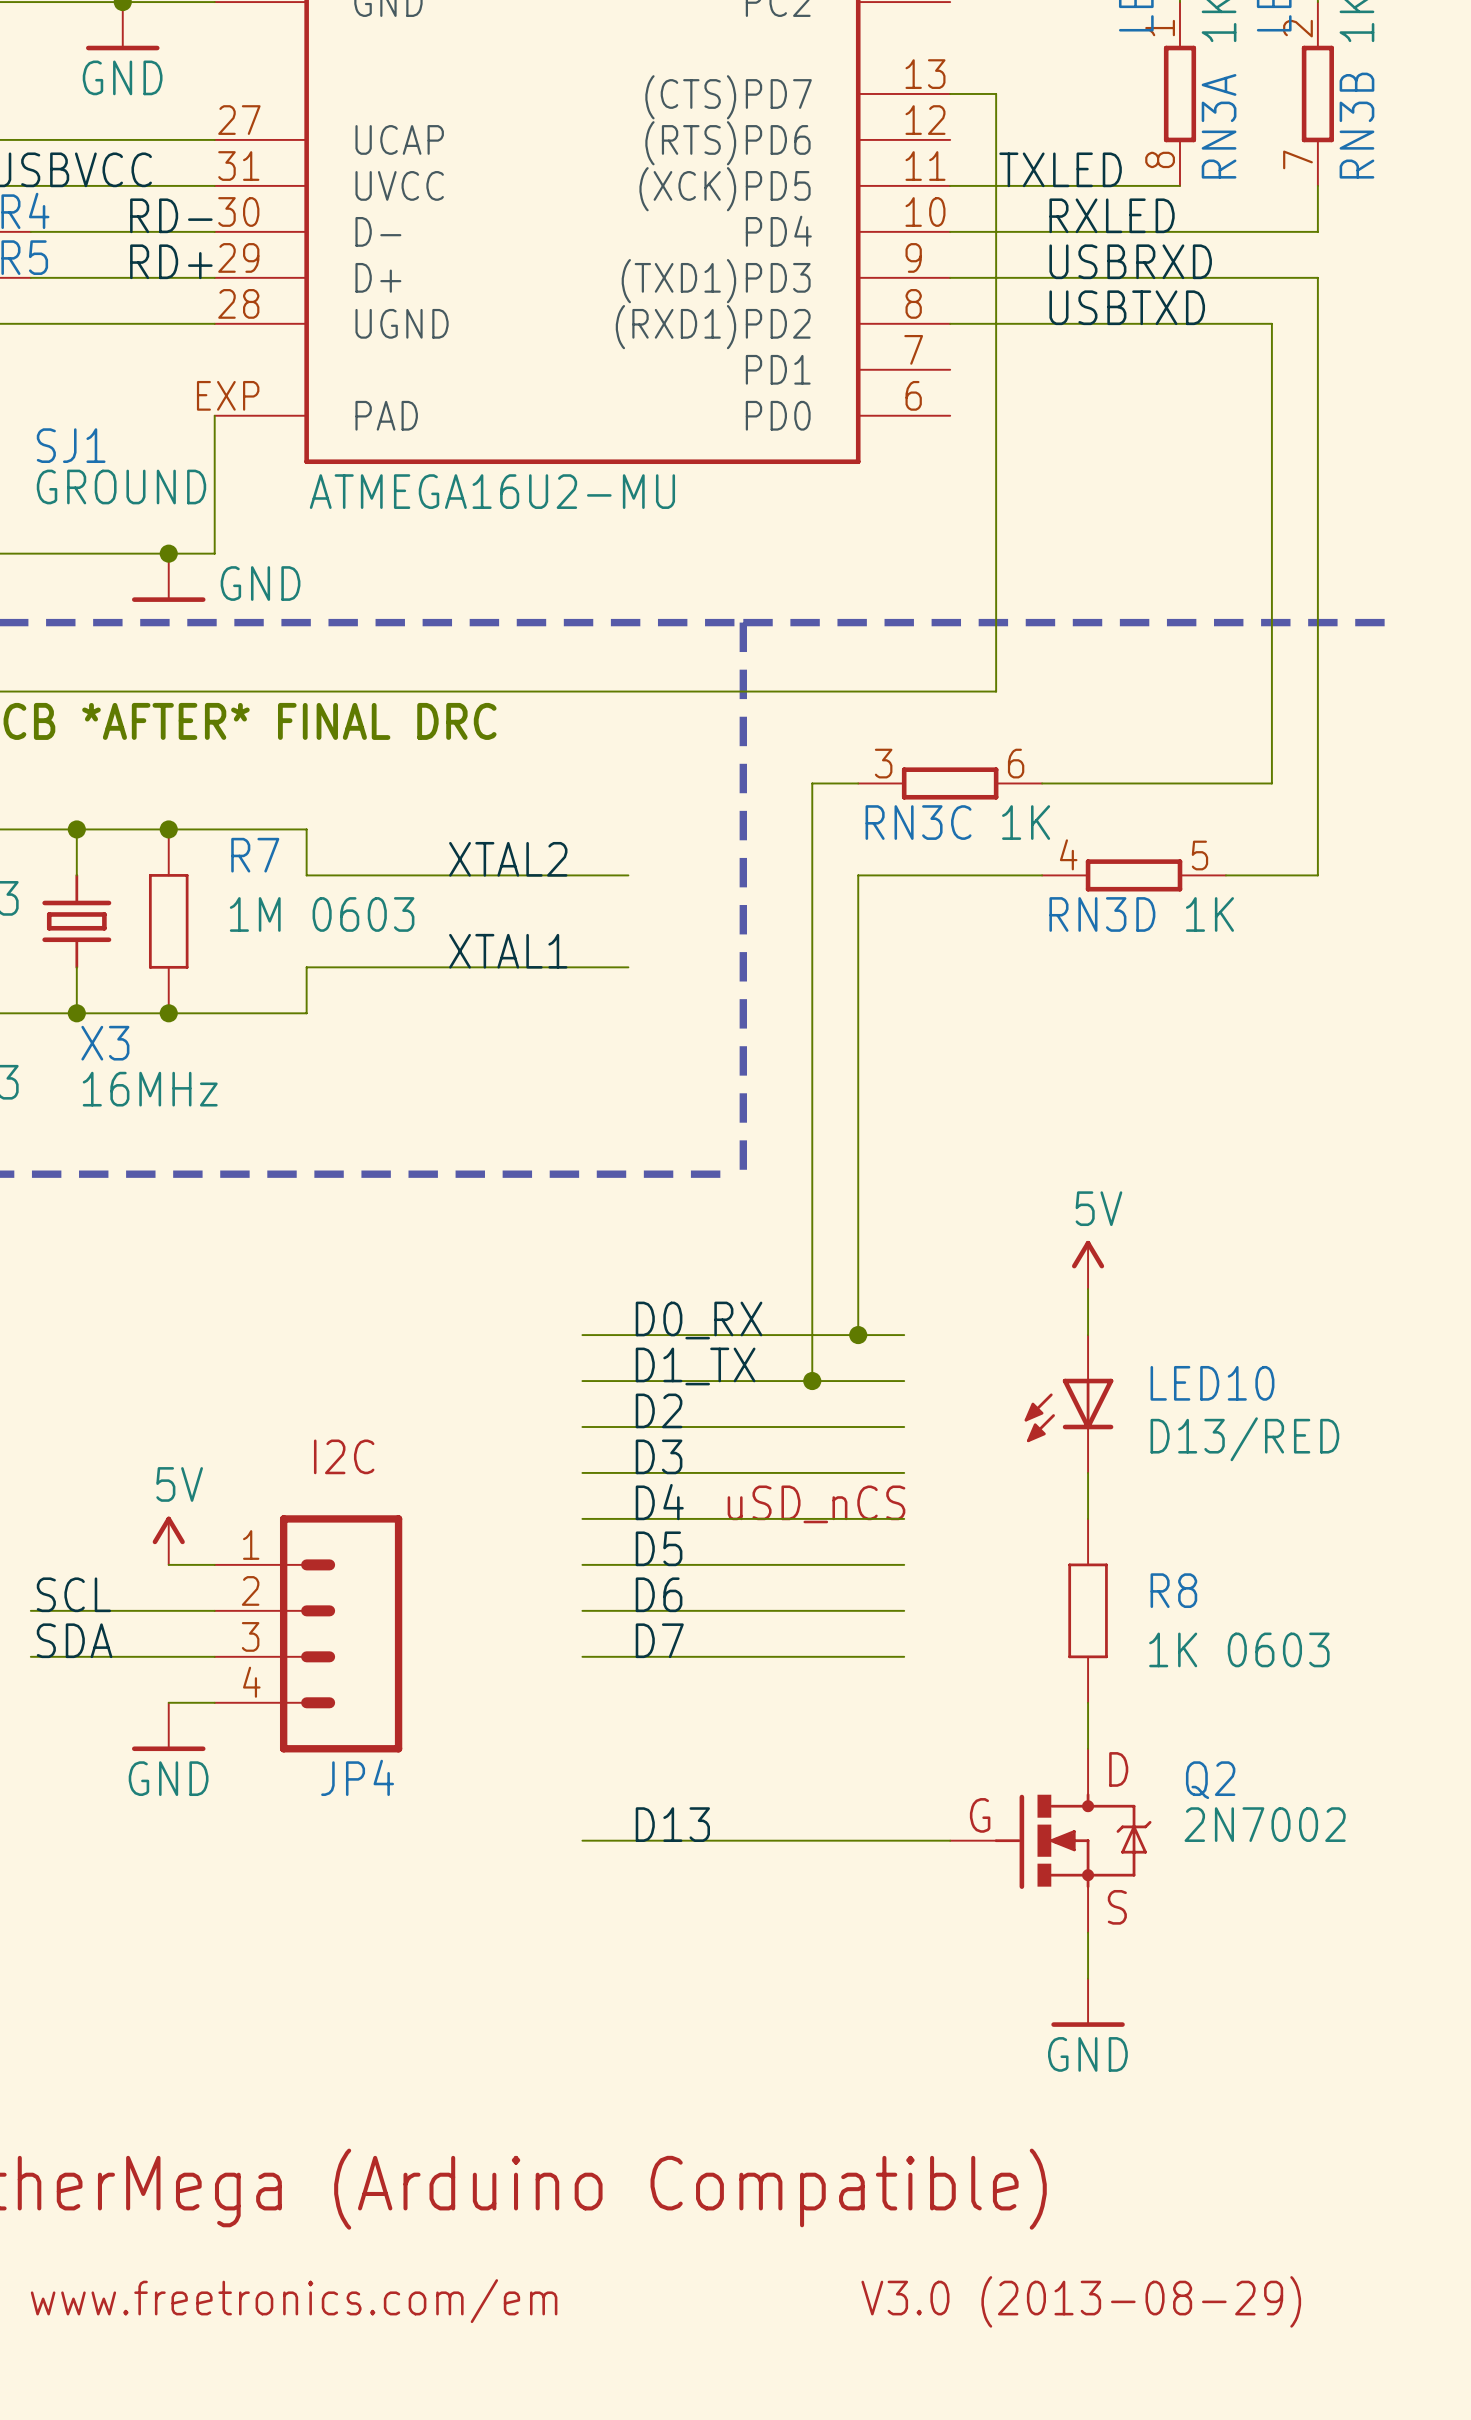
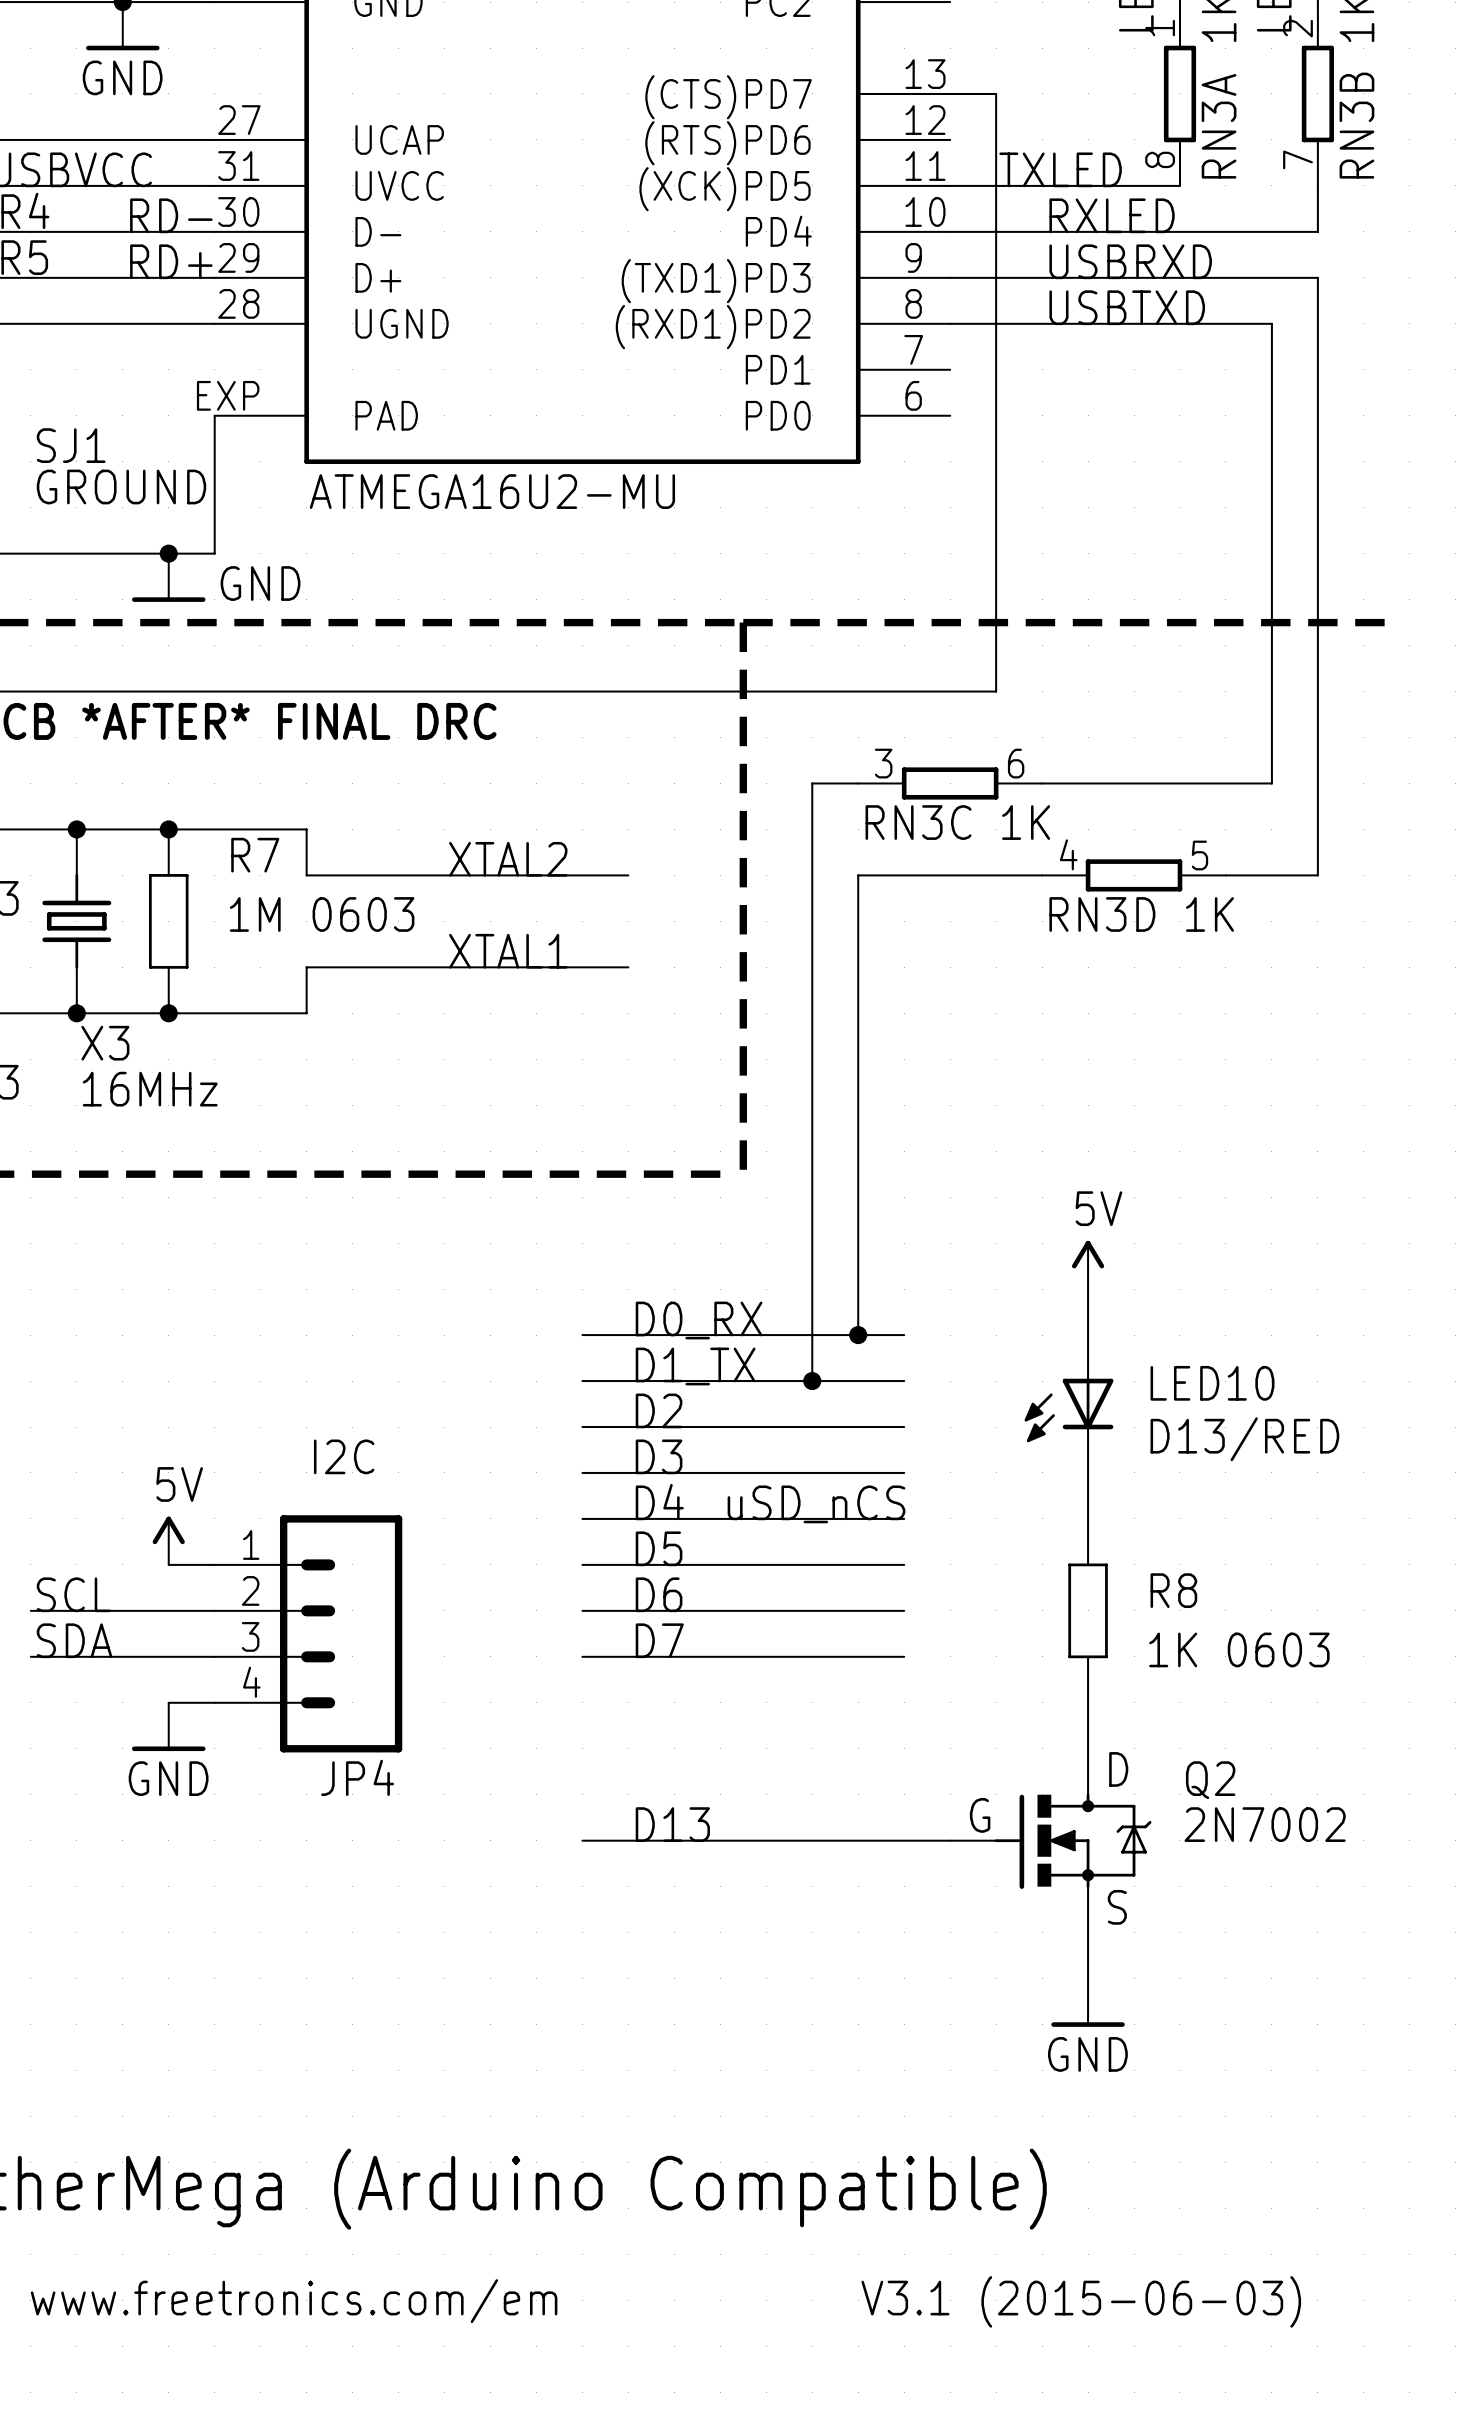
text: V3.0 (2013-08-29) (1081, 2301) -> V3.1 (2015-06-03) (1081, 2301)

